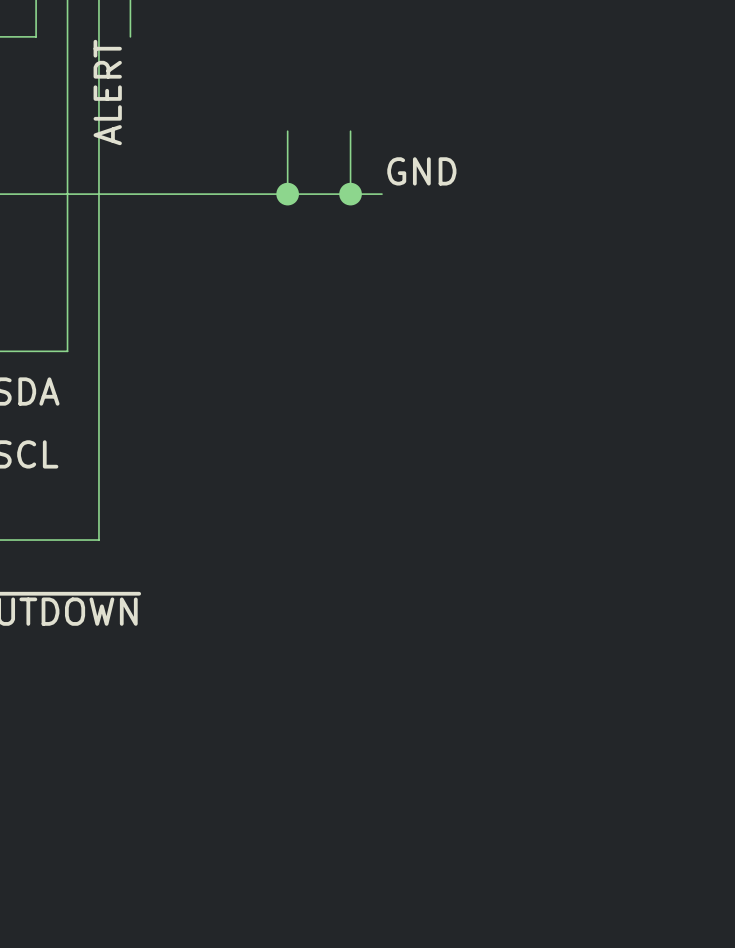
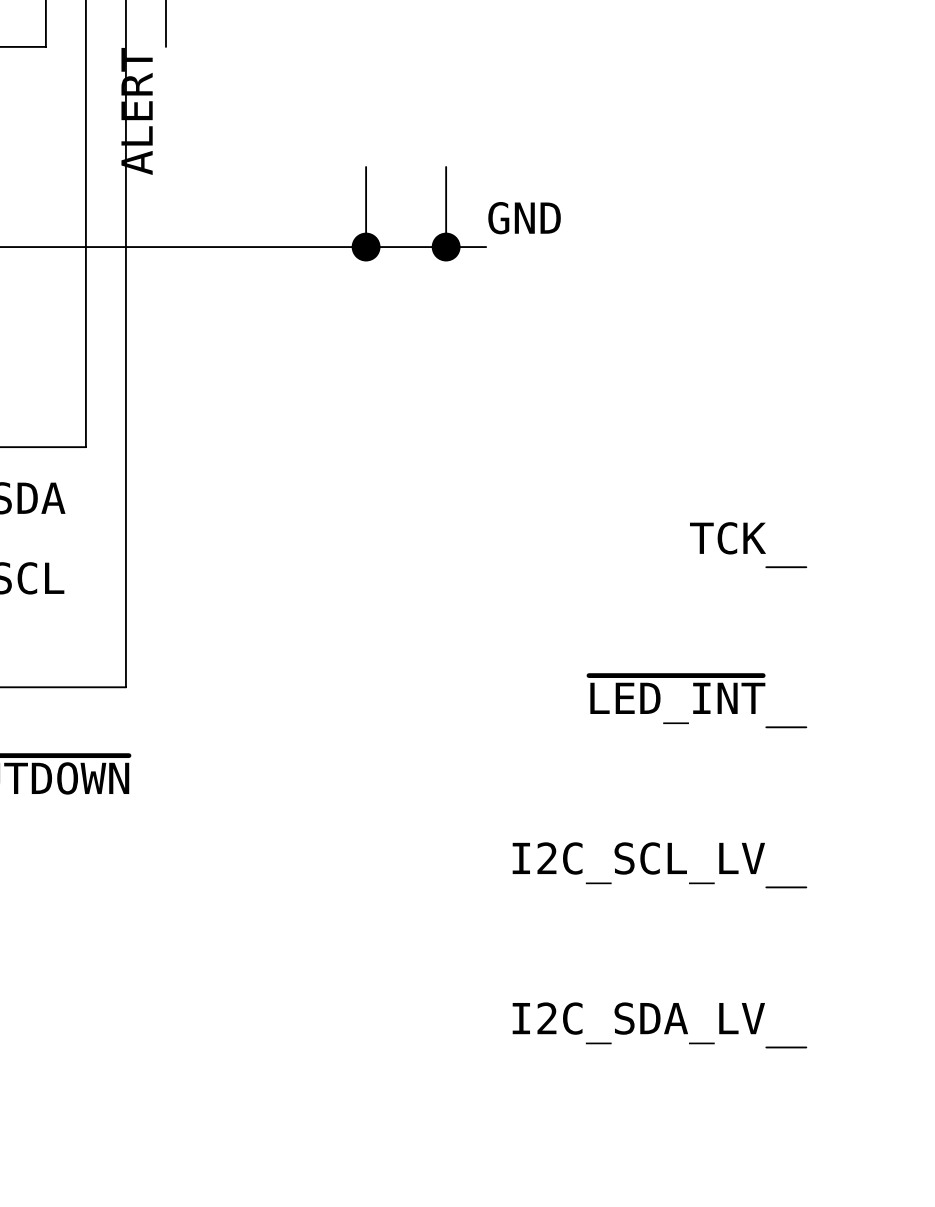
label: none -> TCK (728, 538)
wire: none -> (766, 567) (806, 567)
label: none -> ~{LED_INT} (677, 699)
wire: none -> (766, 727) (806, 727)
label: none -> I2C_SCL_LV (638, 863)
wire: none -> (766, 887) (806, 887)
label: none -> I2C_SDA_LV (638, 1023)
wire: none -> (766, 1047) (806, 1047)

